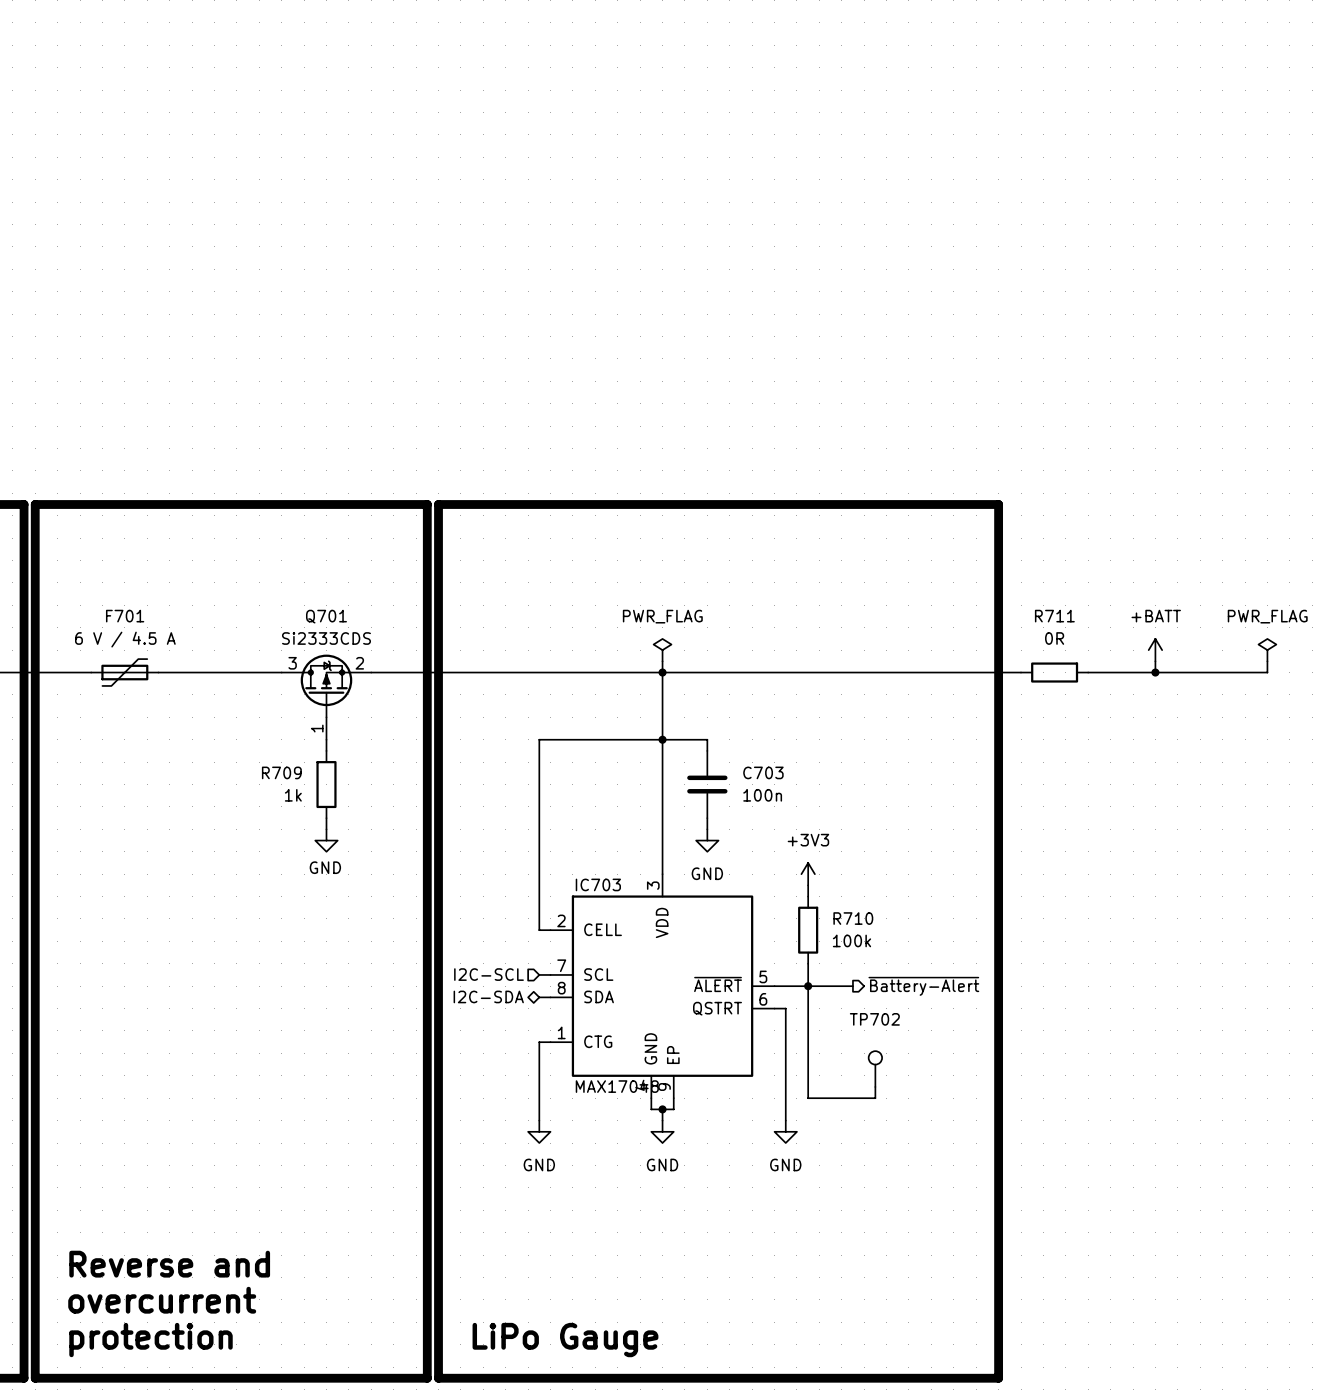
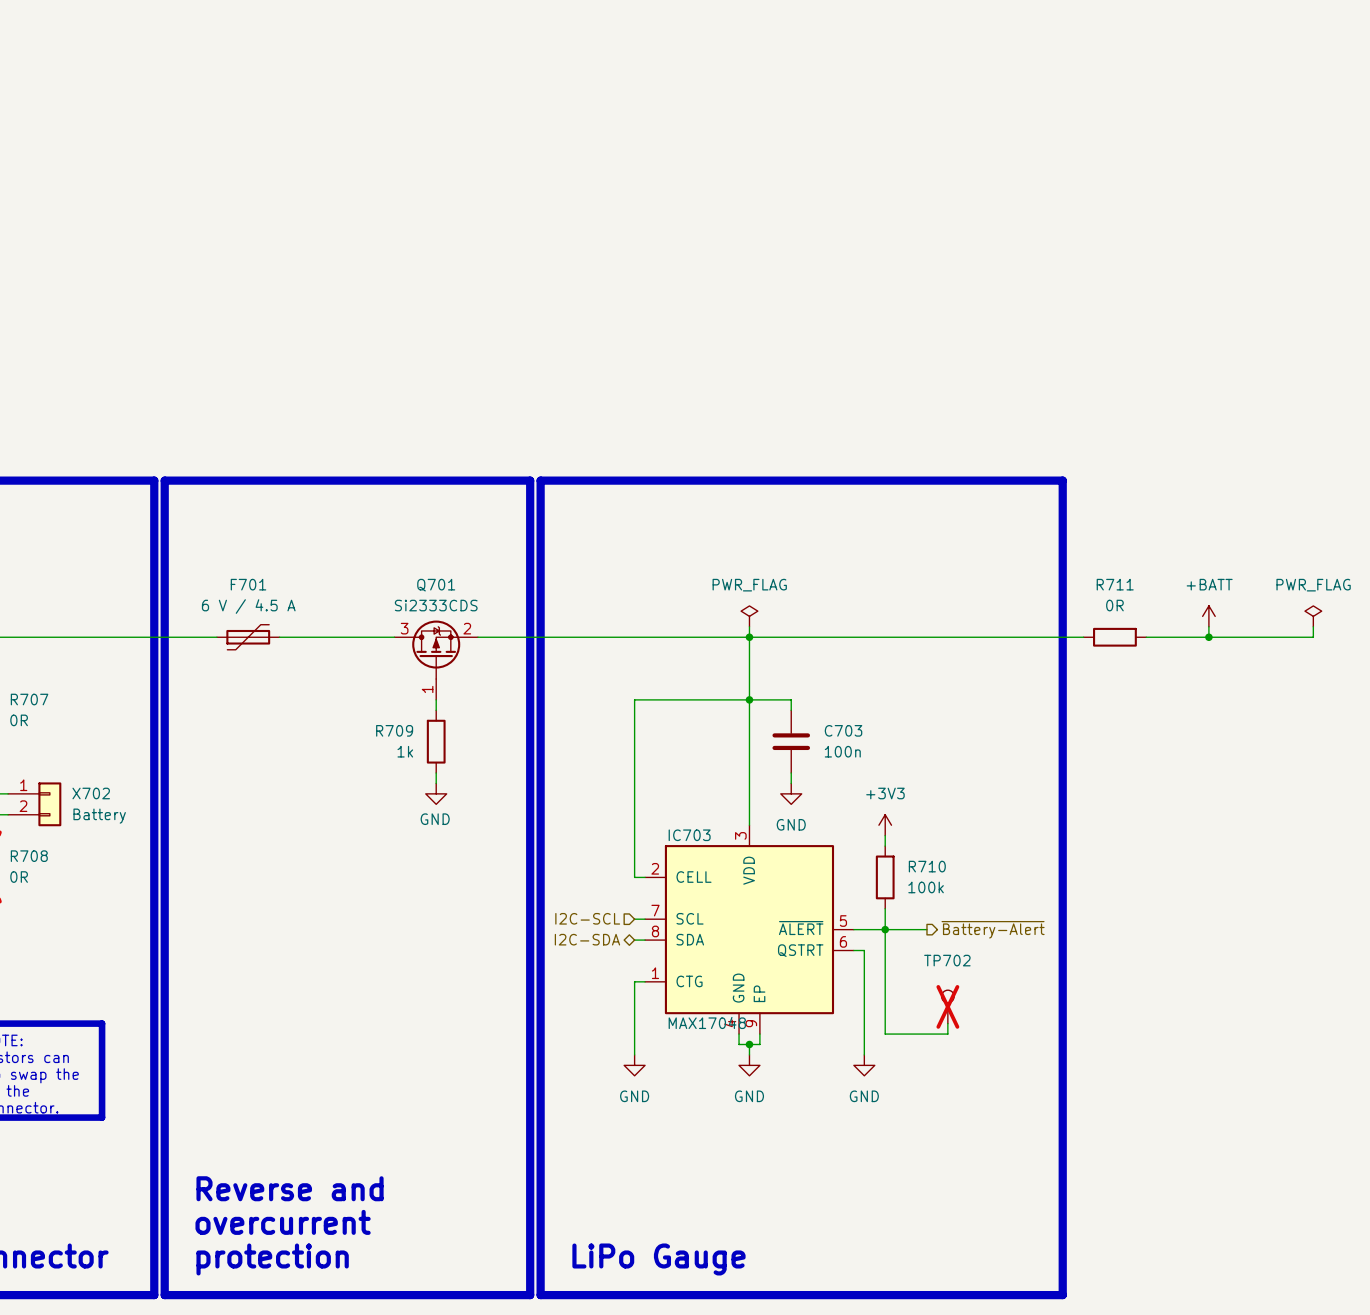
TP702 do-not-place cross: none -> (947, 1006)

